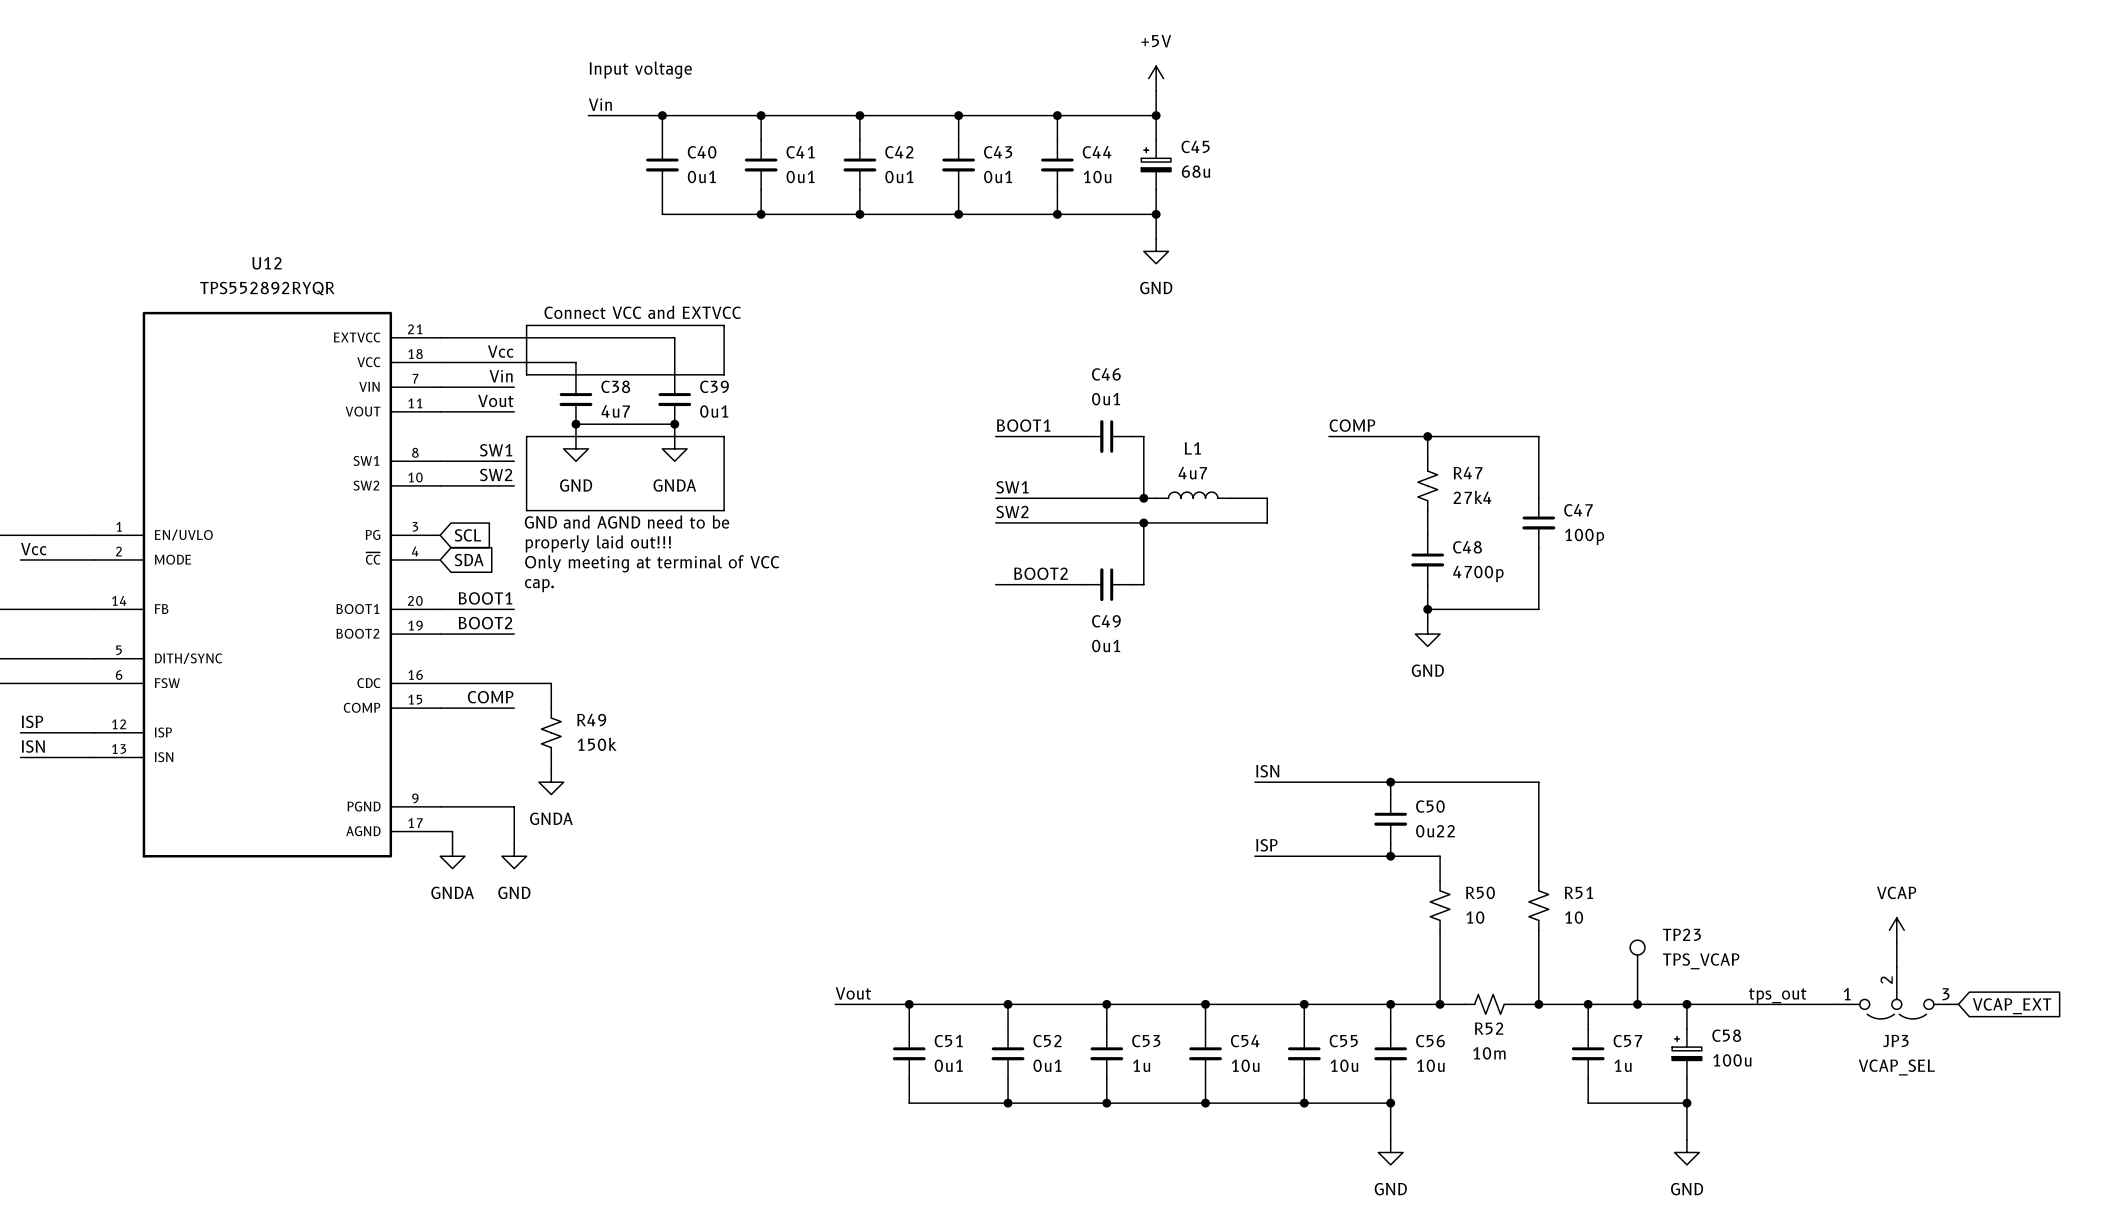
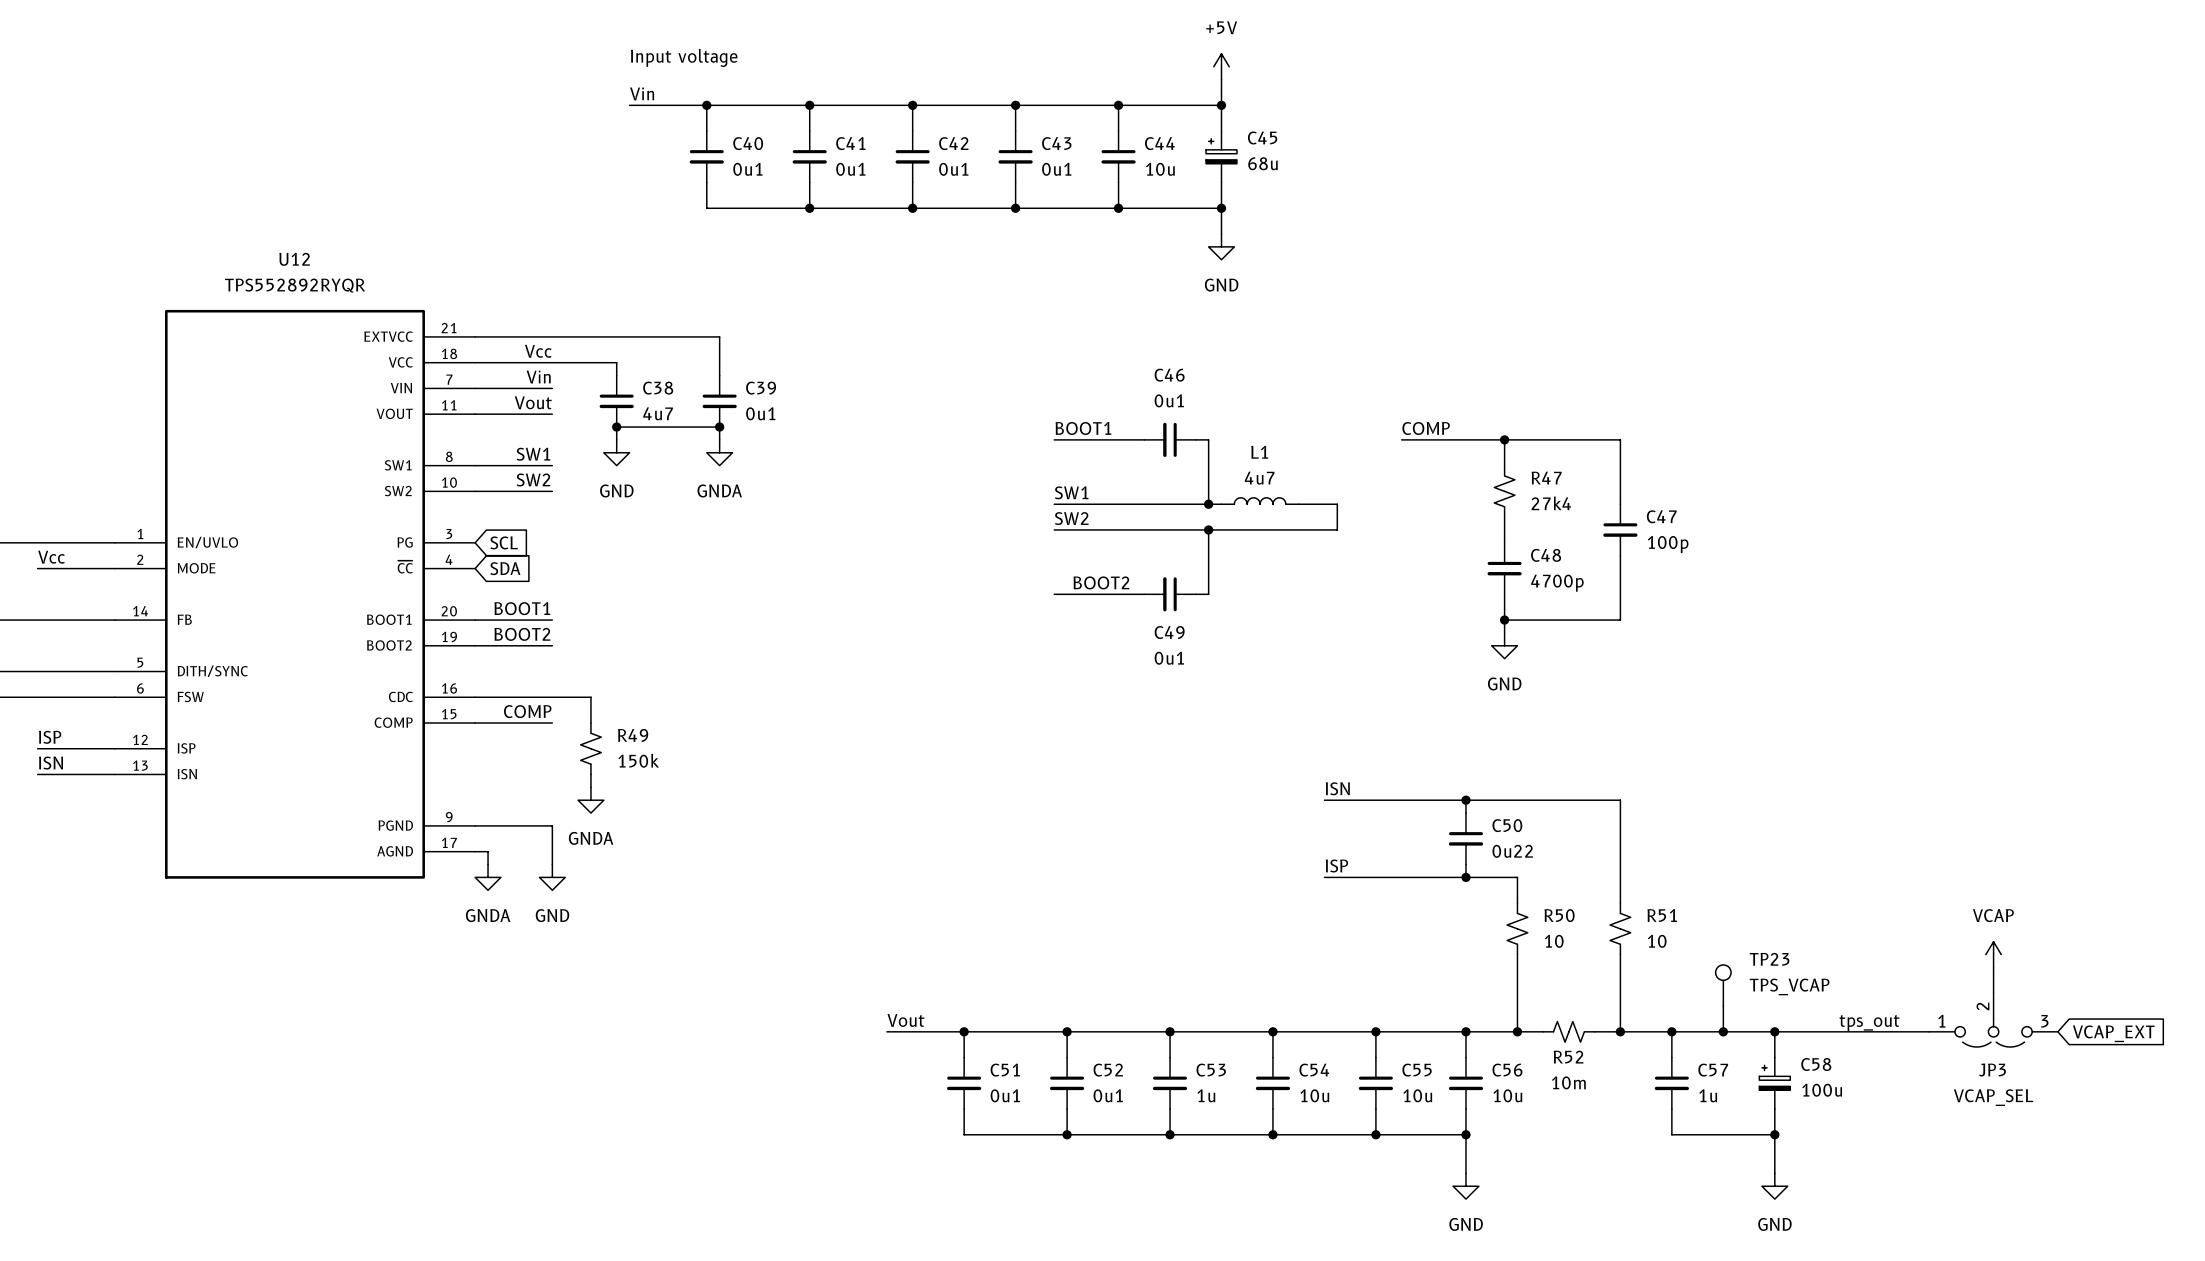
text: Connect VCC and EXTVCC (642, 312) -> none
line: (526, 325) (526, 374) (724, 374) (724, 325) (526, 325) -> none
line: (526, 436) (724, 436) (724, 510) (526, 510) (526, 436) -> none
text: GND and AGND need to be (626, 522) -> none
text: properly laid out!!! (598, 543) -> none
text: Only meeting at terminal of VCC (652, 563) -> none
text: cap. (539, 585) -> none

